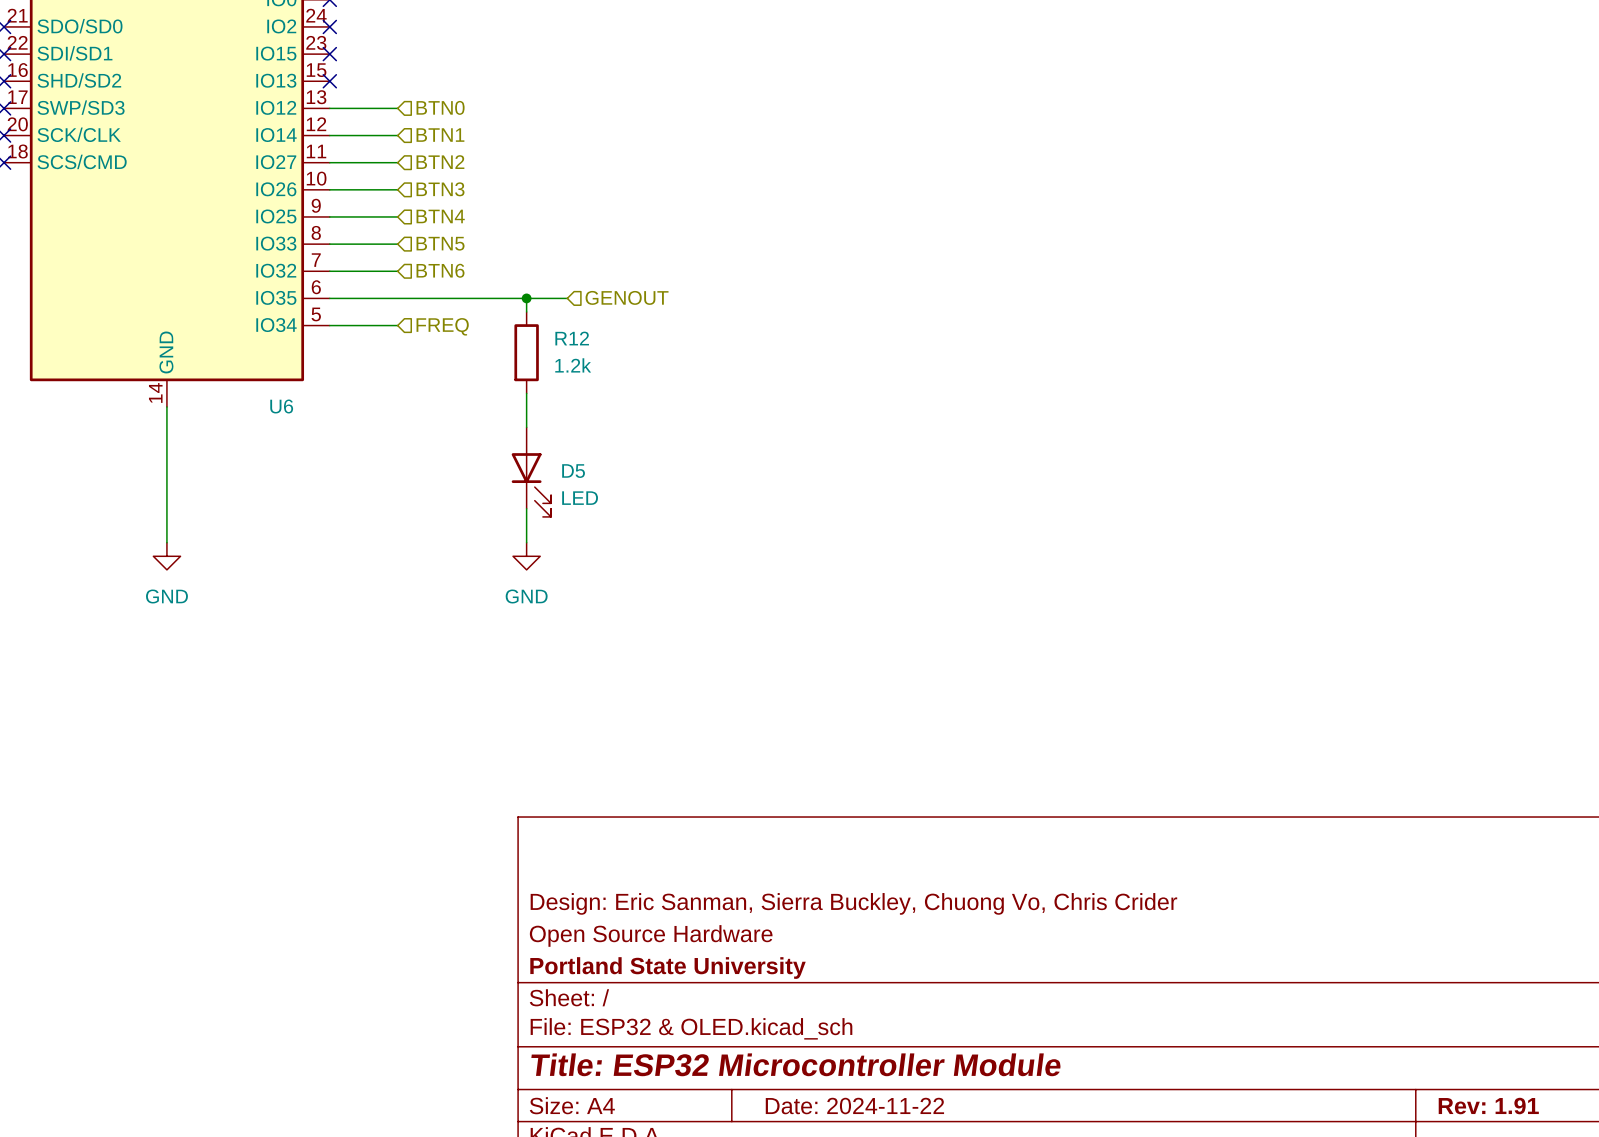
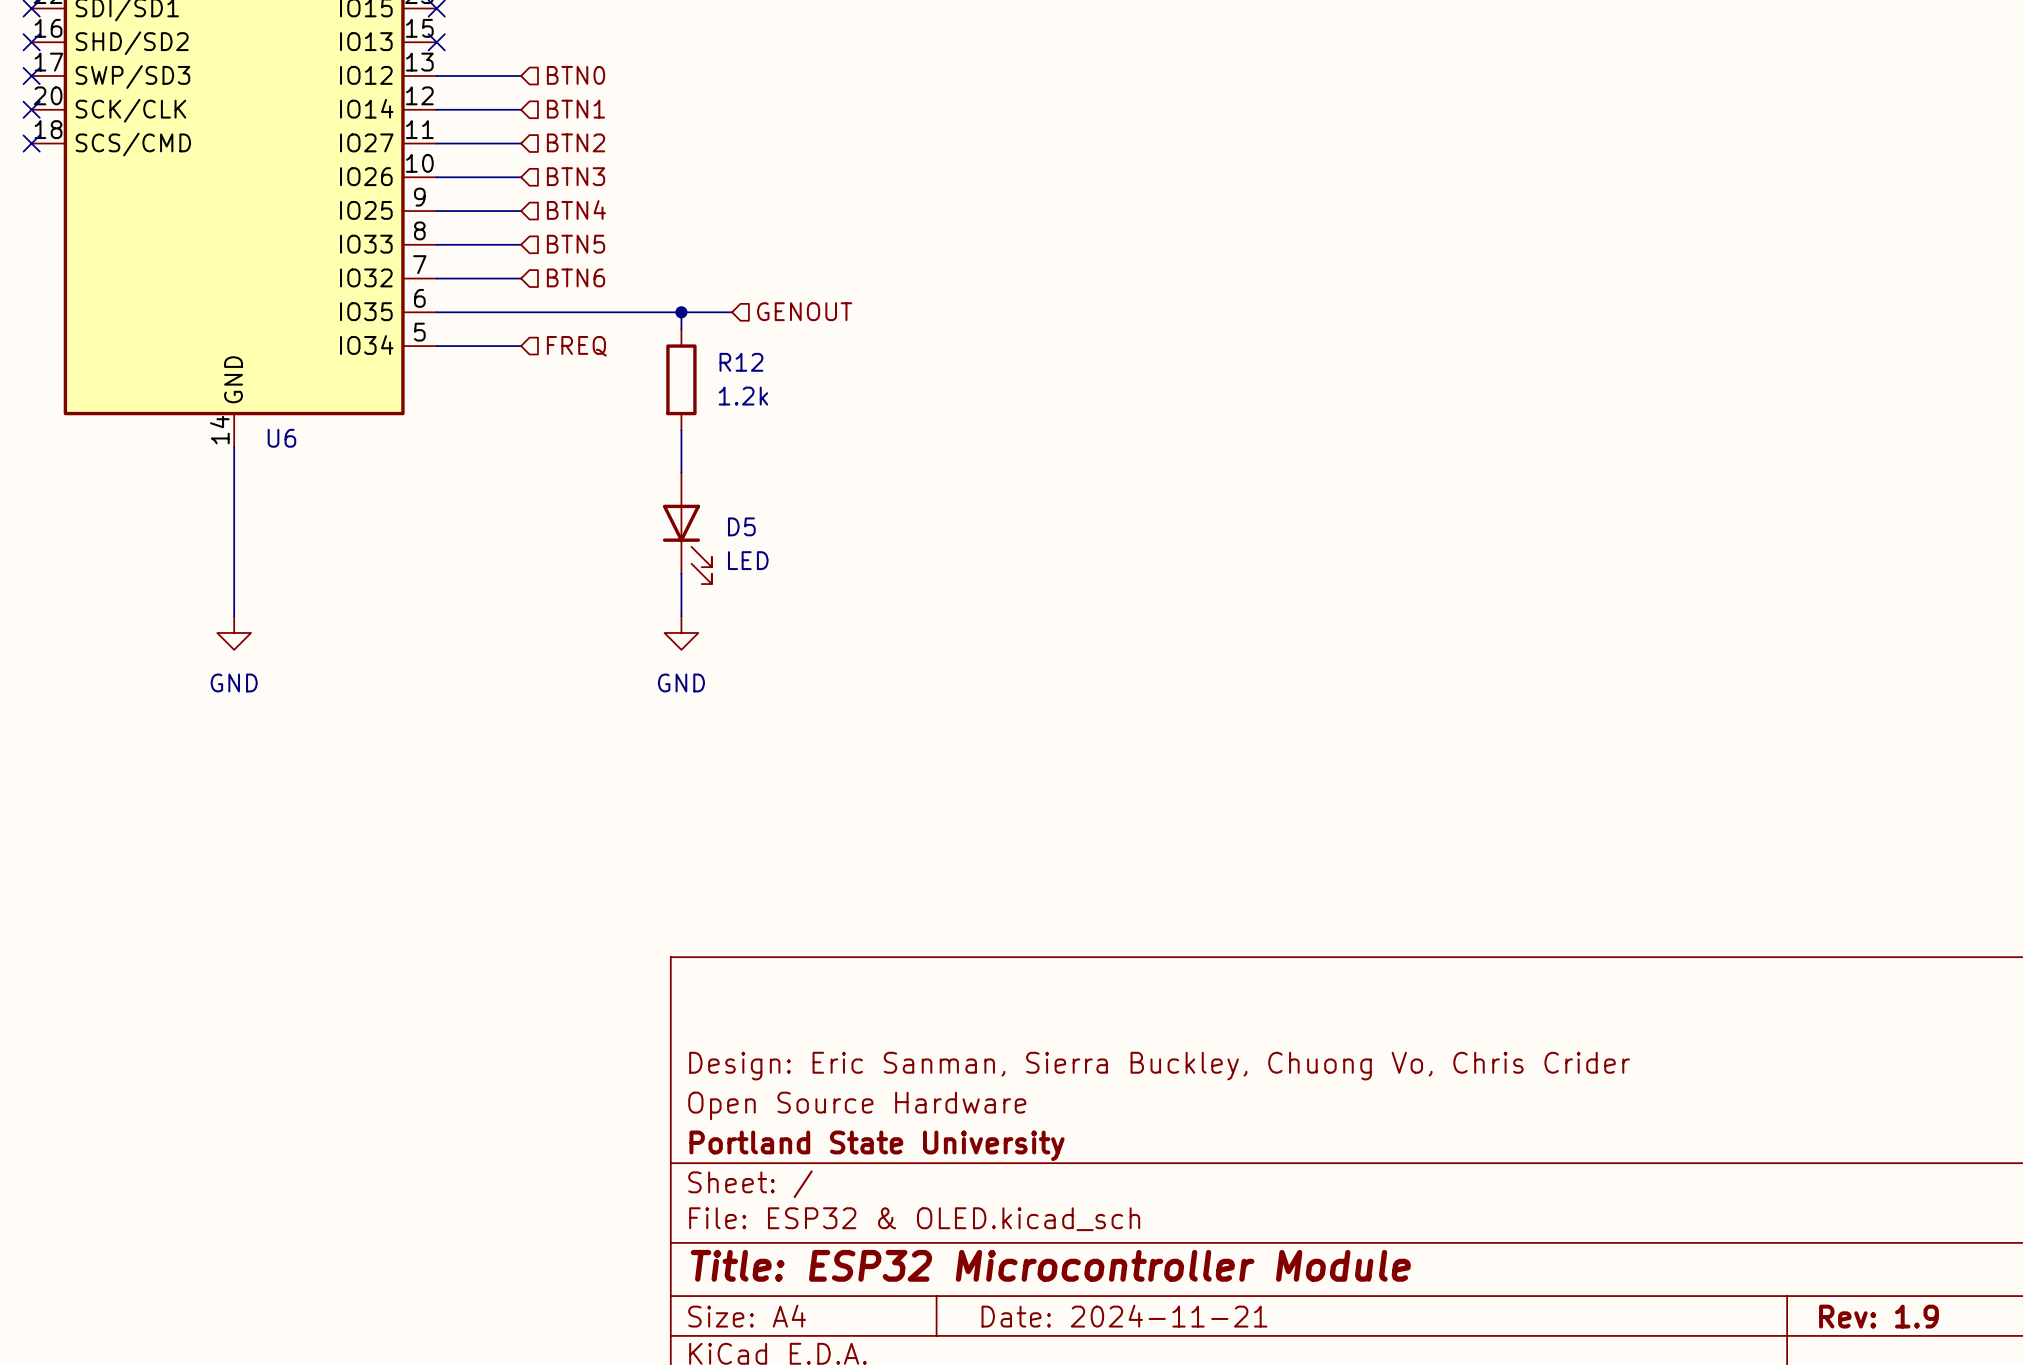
U6 name position: U6 (281, 406) -> U6 (281, 438)
title block: Date: 2024-11-22 (854, 1106) -> Date: 2024-11-21 (1124, 1316)
title block: Rev: 1.91 (1488, 1106) -> Rev: 1.9 (1878, 1316)

